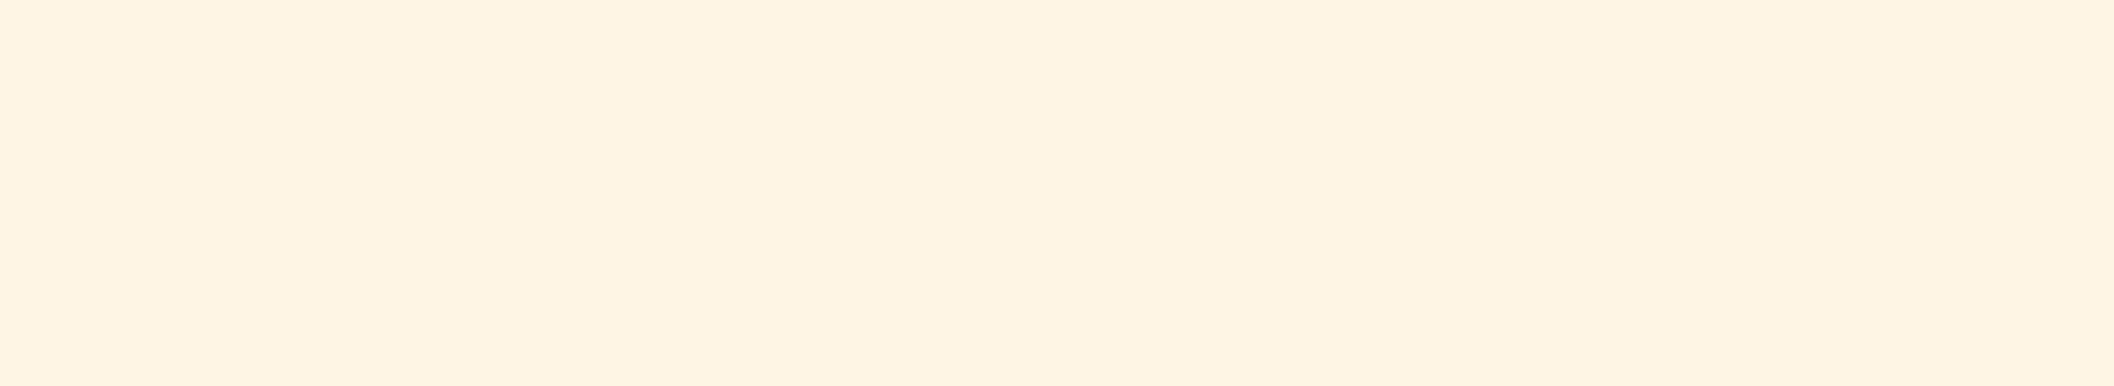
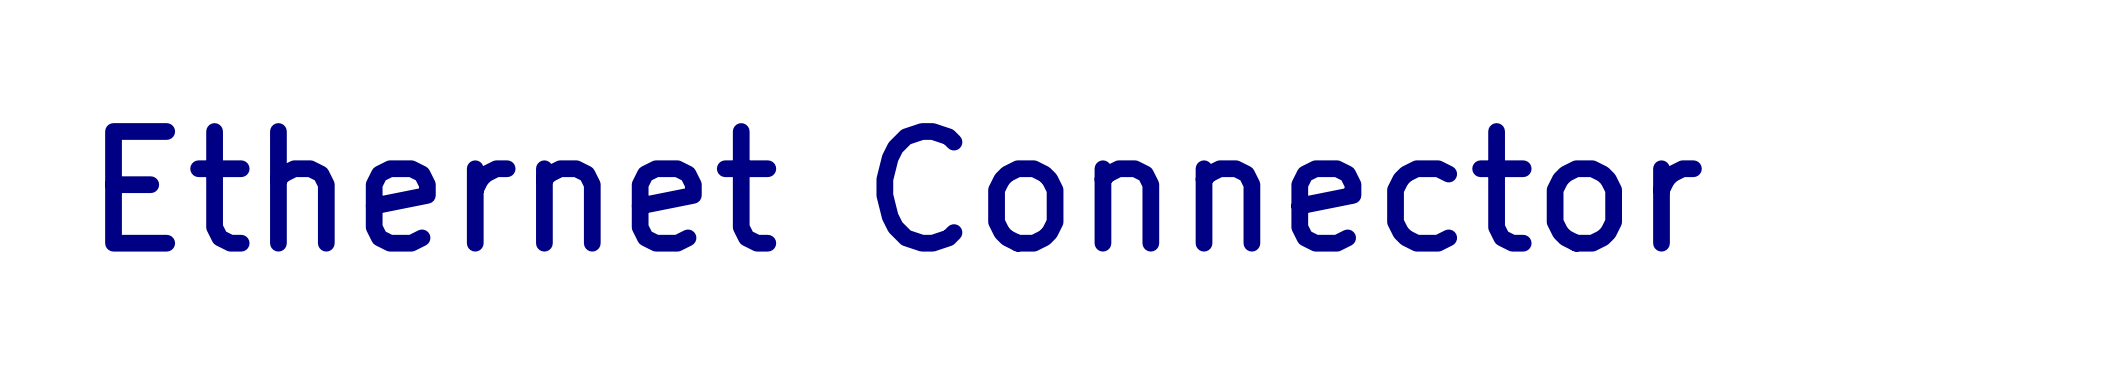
text: none -> Ethernet Connector (903, 187)

